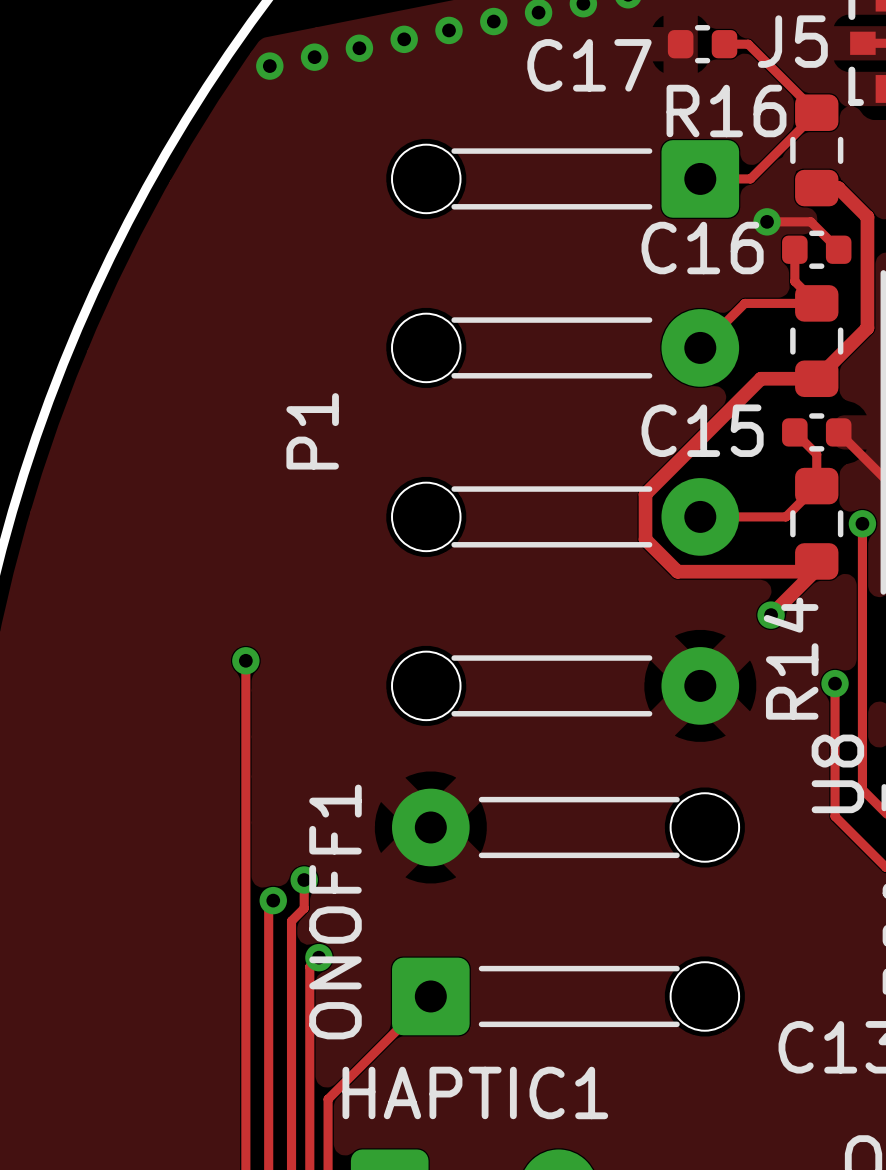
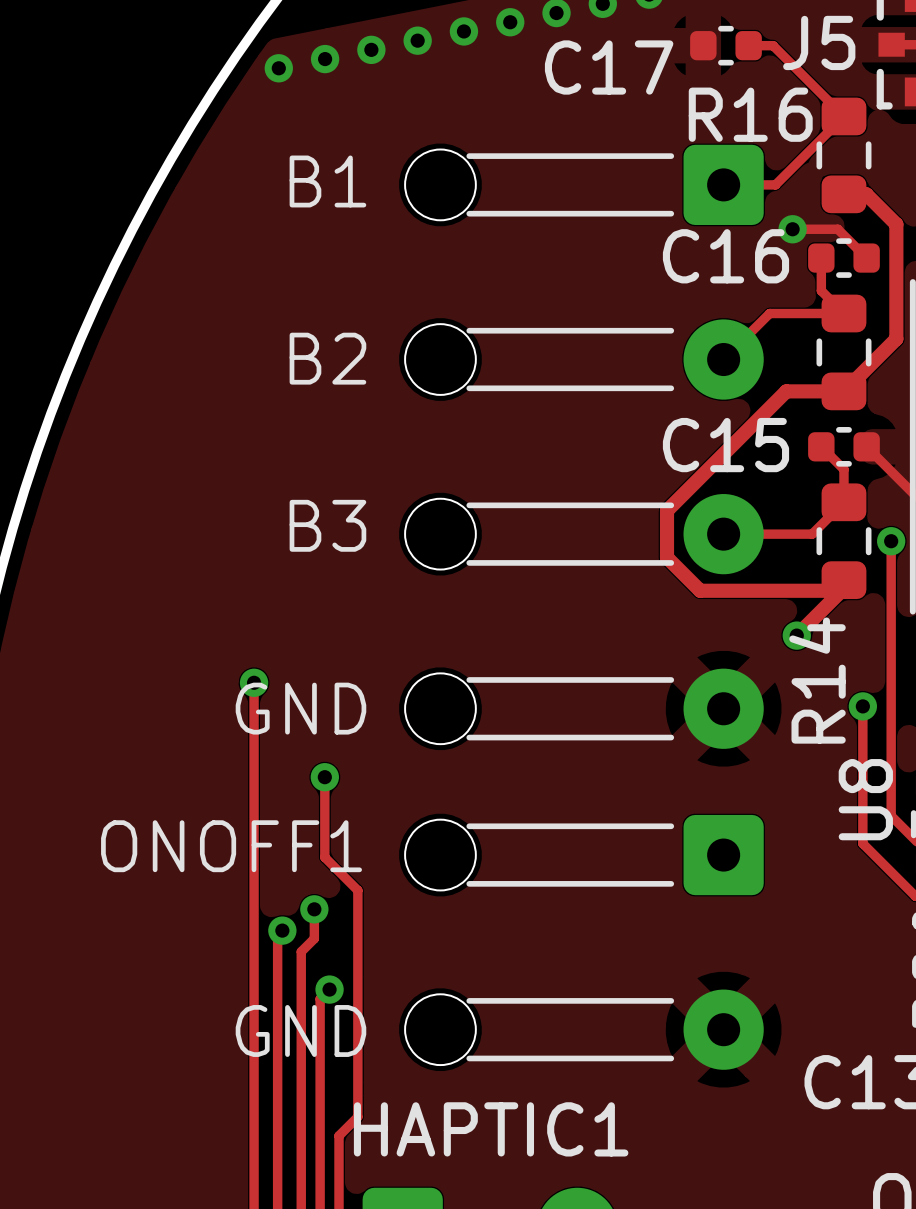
text: none -> B1 (327, 181)
text: none -> B2 (327, 358)
P1 name: P1 (312, 431) -> none
text: none -> B3 (327, 525)
text: none -> GND (300, 708)
via: none -> (324, 777)
ONOFF1 name position: ONOFF1 (335, 911) -> ONOFF1 (231, 846)
ONOFF1 rotation: 0° (565, 911) -> 180° (584, 942)
track: (430, 996) (346, 1080) -> (324, 777) (324, 857) (357, 890) (357, 1116)
text: none -> GND (300, 1030)

